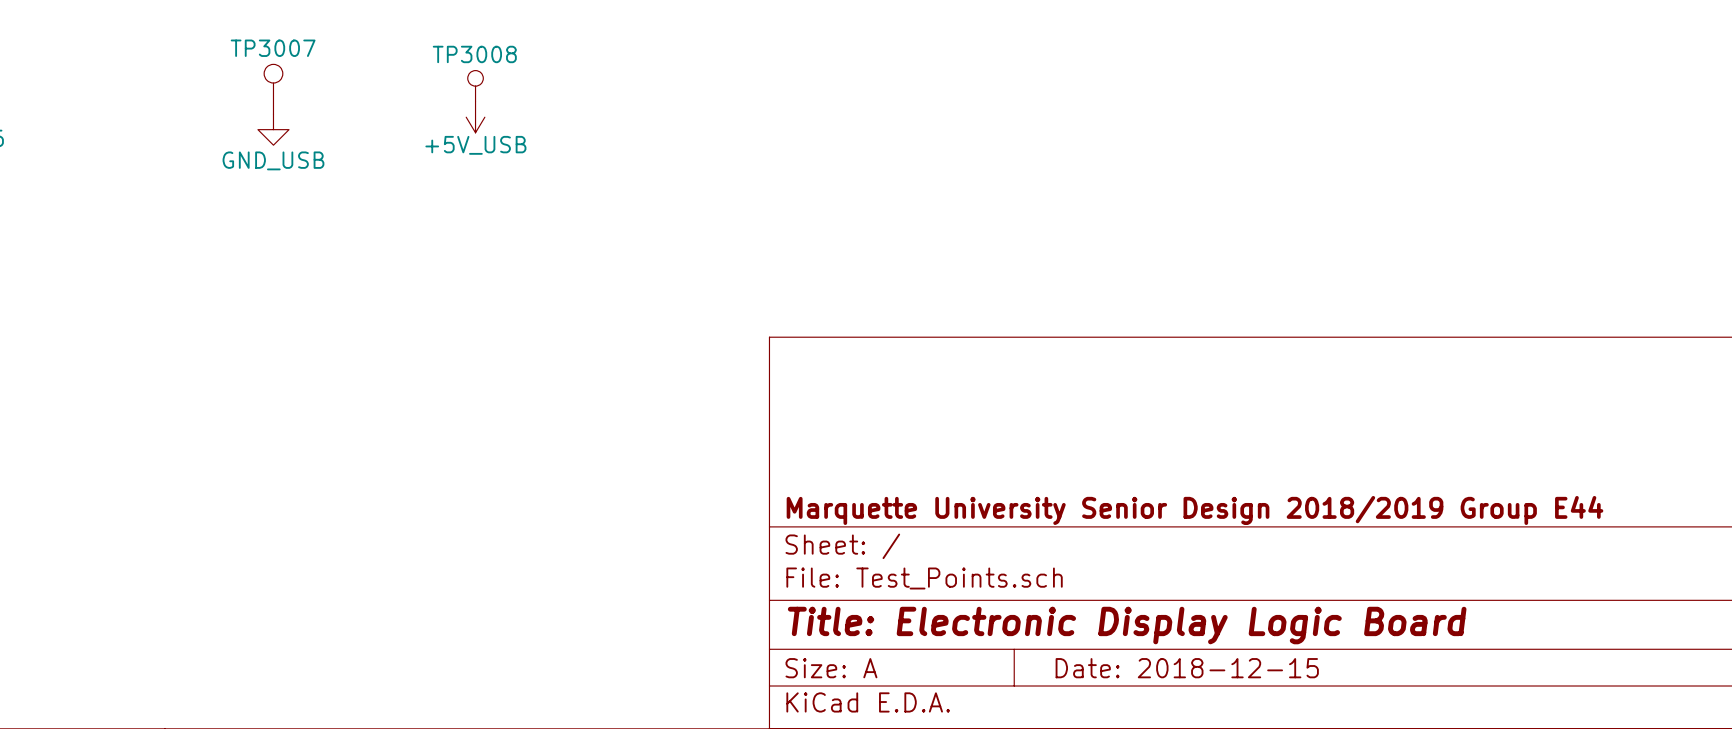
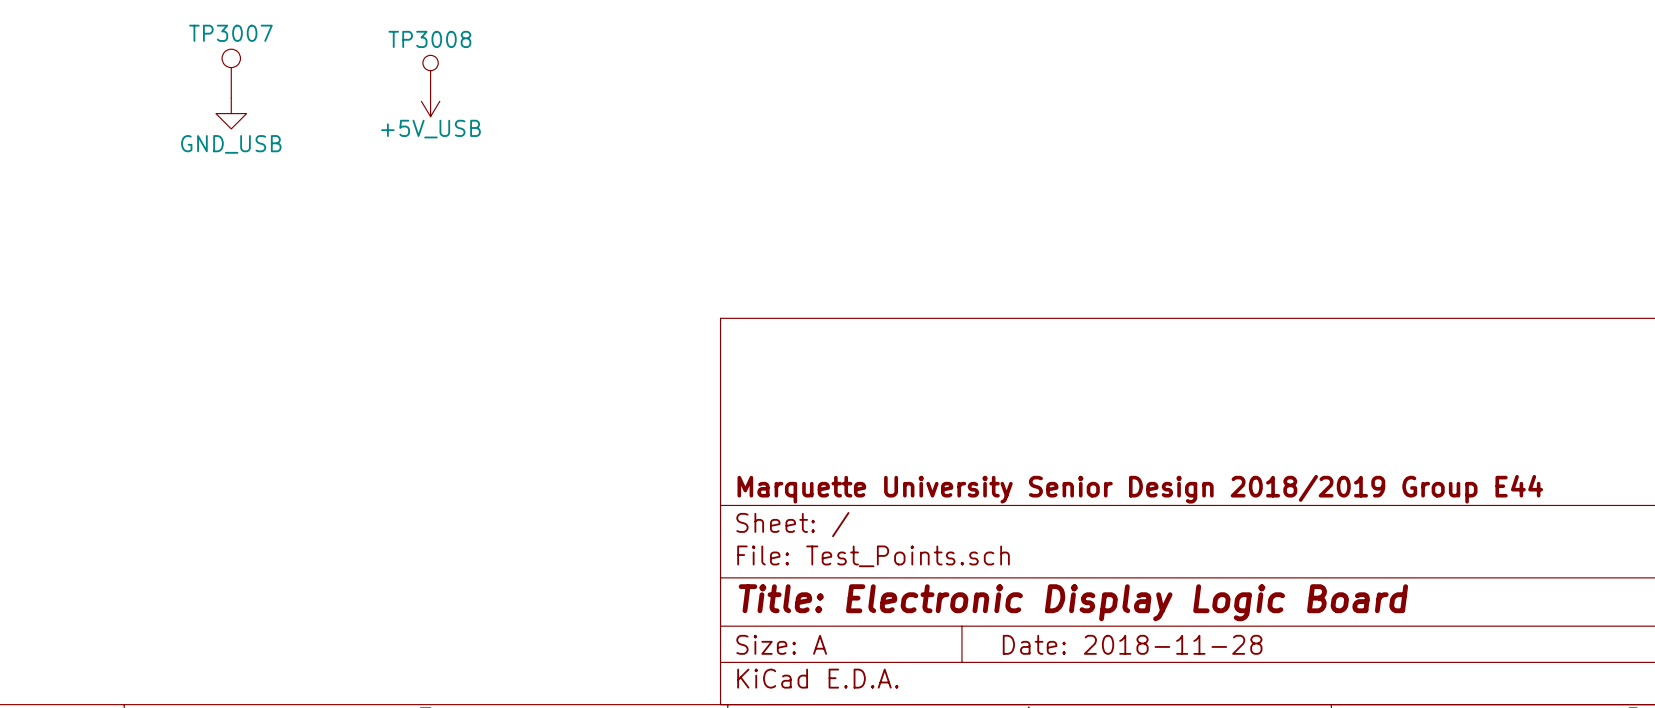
title block: Date: 2018-12-15 (1187, 668) -> Date: 2018-11-28 (1132, 644)

